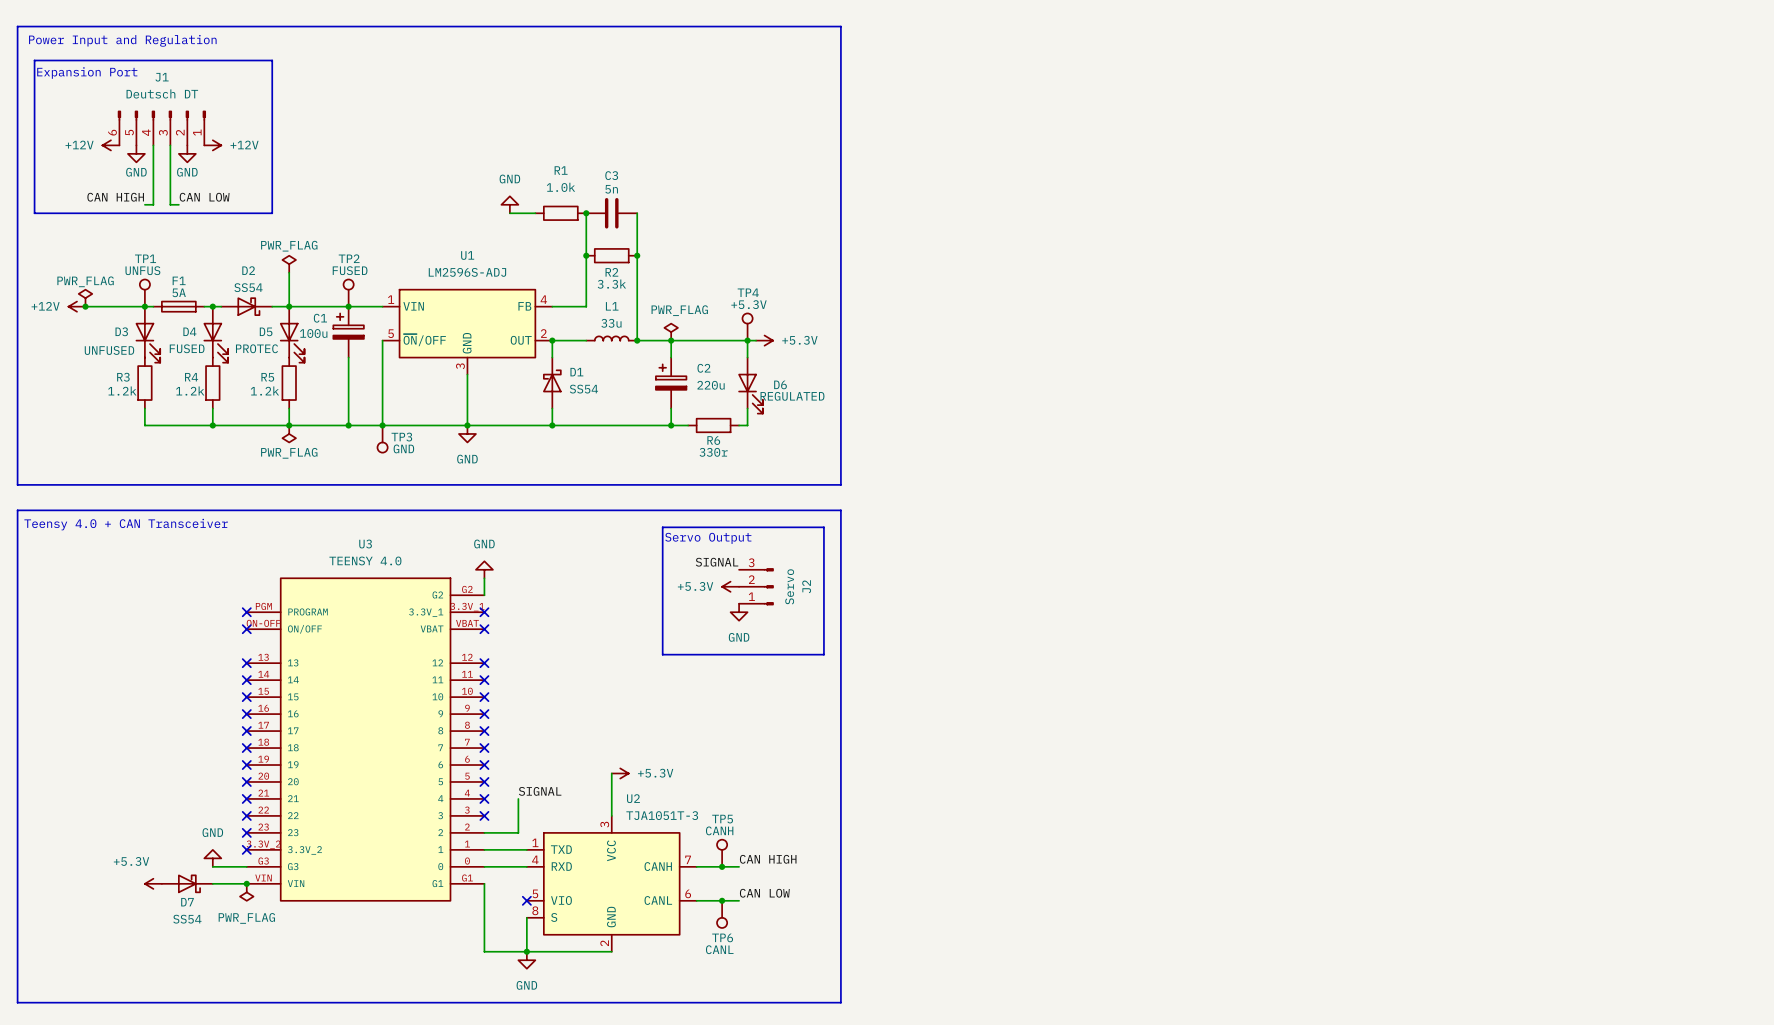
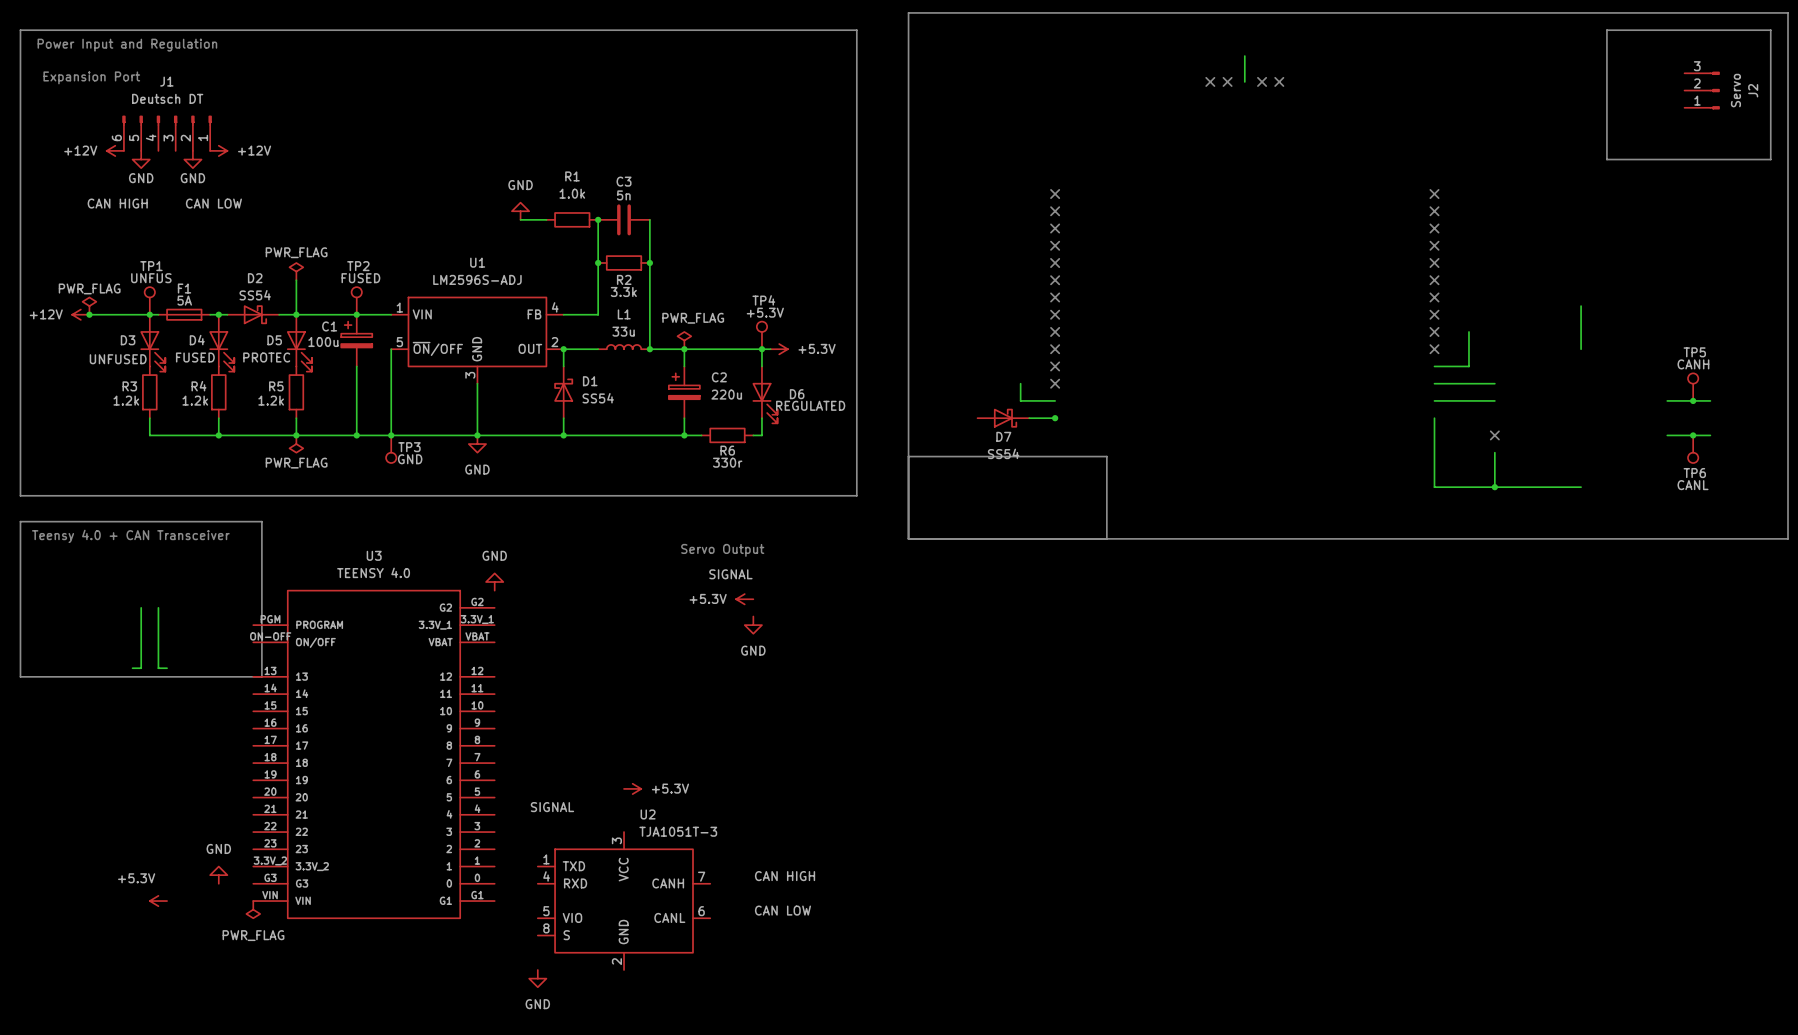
line: none -> (908, 12) (1788, 12) (1788, 538) (908, 538) (908, 12)
line: none -> (1606, 30) (1770, 30) (1770, 159) (1606, 159) (1606, 30)
wire: none -> (1244, 56) (1244, 81)
line: (34, 60) (272, 60) (272, 213) (34, 213) (34, 60) -> none
no-connect mark: none -> (1210, 81)
no-connect mark: none -> (1227, 81)
no-connect mark: none -> (1262, 81)
no-connect mark: none -> (1279, 81)
wire: (153, 145) (153, 204) (144, 204) -> none
wire: (170, 145) (170, 204) (178, 204) -> none
no-connect mark: none -> (1055, 194)
no-connect mark: none -> (1434, 194)
no-connect mark: none -> (1055, 211)
no-connect mark: none -> (1434, 211)
no-connect mark: none -> (1055, 228)
no-connect mark: none -> (1434, 228)
no-connect mark: none -> (1055, 245)
no-connect mark: none -> (1434, 245)
no-connect mark: none -> (1055, 262)
no-connect mark: none -> (1434, 262)
no-connect mark: none -> (1055, 280)
no-connect mark: none -> (1434, 280)
no-connect mark: none -> (1055, 297)
no-connect mark: none -> (1434, 297)
wire: none -> (1581, 306) (1581, 349)
no-connect mark: none -> (1055, 314)
no-connect mark: none -> (1434, 314)
no-connect mark: none -> (1055, 331)
no-connect mark: none -> (1434, 331)
wire: none -> (1468, 331) (1468, 366) (1434, 366)
no-connect mark: none -> (1055, 349)
no-connect mark: none -> (1434, 349)
no-connect mark: none -> (1055, 366)
wire: none -> (1020, 383) (1020, 400) (1055, 400)
no-connect mark: none -> (1055, 383)
wire: none -> (1434, 383) (1494, 383)
wire: none -> (1434, 400) (1494, 400)
wire: none -> (1667, 400) (1710, 400)
junction: none -> (1693, 400)
wire: none -> (1029, 418) (1055, 418)
junction: none -> (1055, 418)
wire: none -> (1434, 418) (1434, 487) (1581, 487)
no-connect mark: none -> (1494, 435)
wire: none -> (1667, 435) (1710, 435)
junction: none -> (1693, 435)
wire: none -> (1494, 452) (1494, 487)
line: none -> (908, 456) (1106, 456) (1106, 538)
junction: none -> (1494, 487)
line: (255, 510) (840, 510) (840, 1002) (17, 1002) (17, 663) -> (261, 521) (261, 676) (20, 676)
line: (662, 527) (823, 527) (823, 654) (662, 654) (662, 527) -> none
wire: (484, 578) (484, 595) -> none
J2 position: (756, 586) -> (1702, 90)
wire: none -> (141, 607) (141, 668) (132, 668)
wire: none -> (158, 607) (158, 668) (167, 668)
no-connect mark: (246, 612) -> none
no-connect mark: (484, 612) -> none
no-connect mark: (246, 629) -> none
no-connect mark: (484, 629) -> none
no-connect mark: (246, 663) -> none
no-connect mark: (484, 663) -> none
no-connect mark: (246, 680) -> none
no-connect mark: (484, 680) -> none
no-connect mark: (246, 697) -> none
no-connect mark: (484, 697) -> none
no-connect mark: (246, 714) -> none
no-connect mark: (484, 714) -> none
no-connect mark: (246, 731) -> none
no-connect mark: (484, 731) -> none
no-connect mark: (246, 748) -> none
no-connect mark: (484, 748) -> none
no-connect mark: (246, 765) -> none
no-connect mark: (484, 765) -> none
wire: (611, 773) (611, 815) -> none
no-connect mark: (246, 781) -> none
no-connect mark: (484, 781) -> none
no-connect mark: (246, 798) -> none
no-connect mark: (484, 798) -> none
wire: (518, 798) (518, 832) (484, 832) -> none
no-connect mark: (246, 815) -> none
no-connect mark: (484, 815) -> none
no-connect mark: (246, 832) -> none
no-connect mark: (246, 849) -> none
wire: (484, 849) (526, 849) -> none
TP5 position: (722, 853) -> (1693, 387)
wire: (212, 866) (246, 866) -> none
wire: (484, 866) (526, 866) -> none
wire: (696, 866) (739, 866) -> none
junction: (722, 866) -> none
D7 position: (187, 883) -> (1003, 418)
wire: (212, 883) (246, 883) -> none
junction: (246, 883) -> none
wire: (484, 883) (484, 951) (611, 951) -> none
no-connect mark: (526, 900) -> none
wire: (696, 900) (739, 900) -> none
junction: (722, 900) -> none
TP6 position: (722, 914) -> (1693, 449)
wire: (526, 917) (526, 951) -> none
junction: (526, 951) -> none

